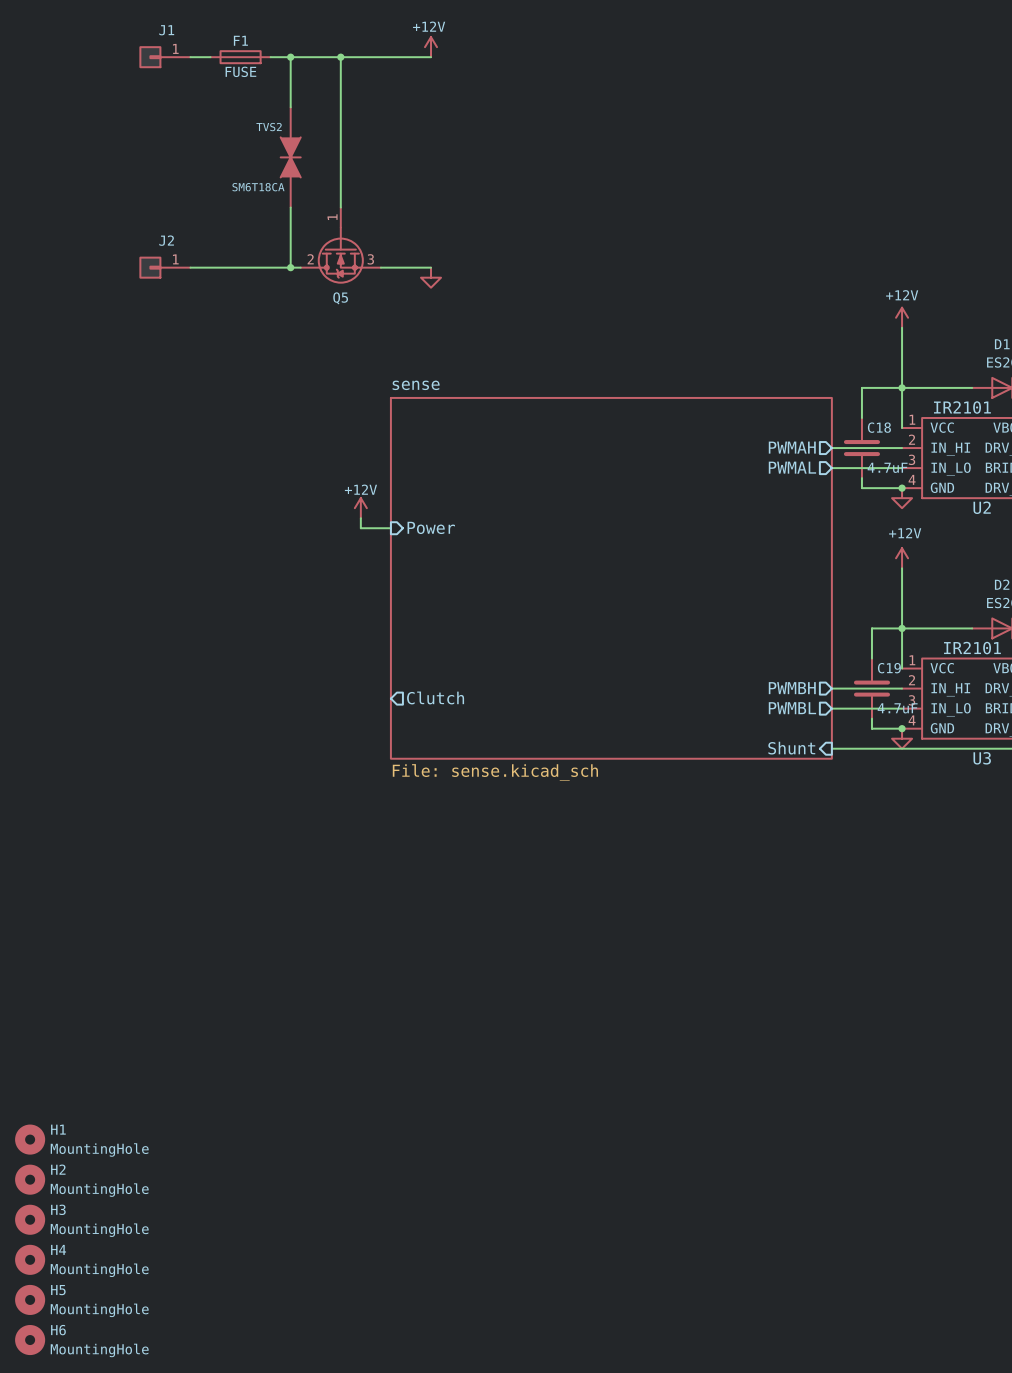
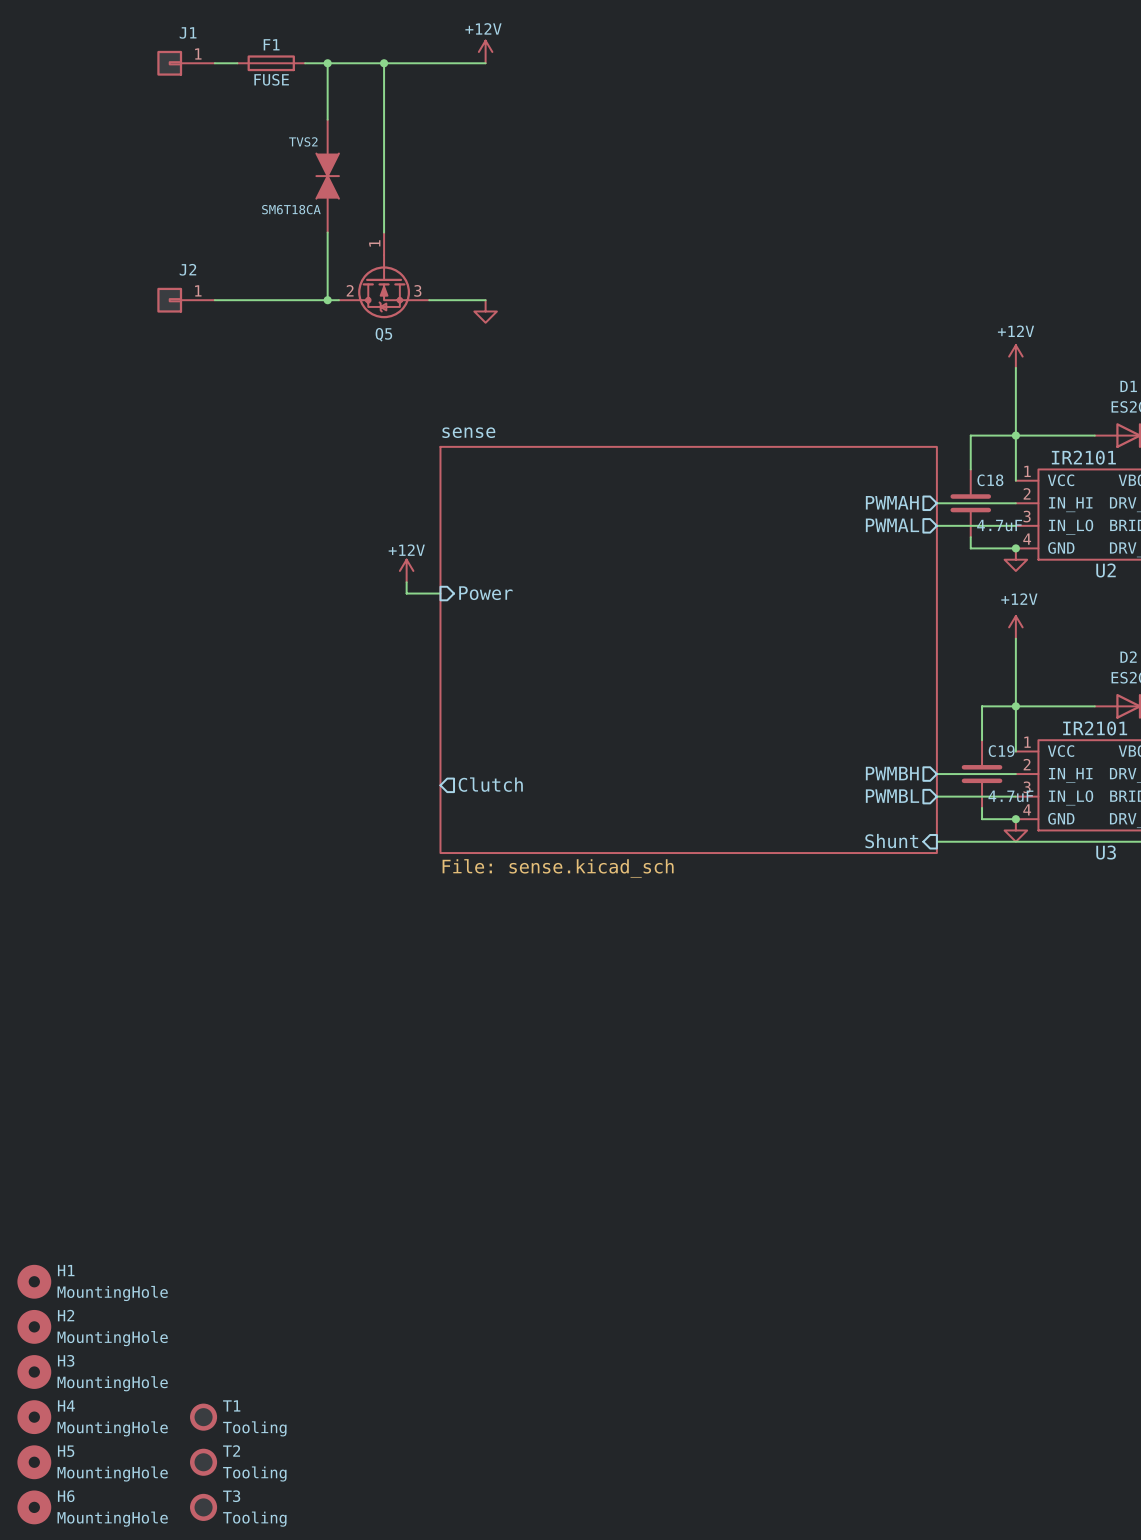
T1: none -> Tooling (203, 1417)
T2: none -> Tooling (203, 1462)
T3: none -> Tooling (203, 1507)

